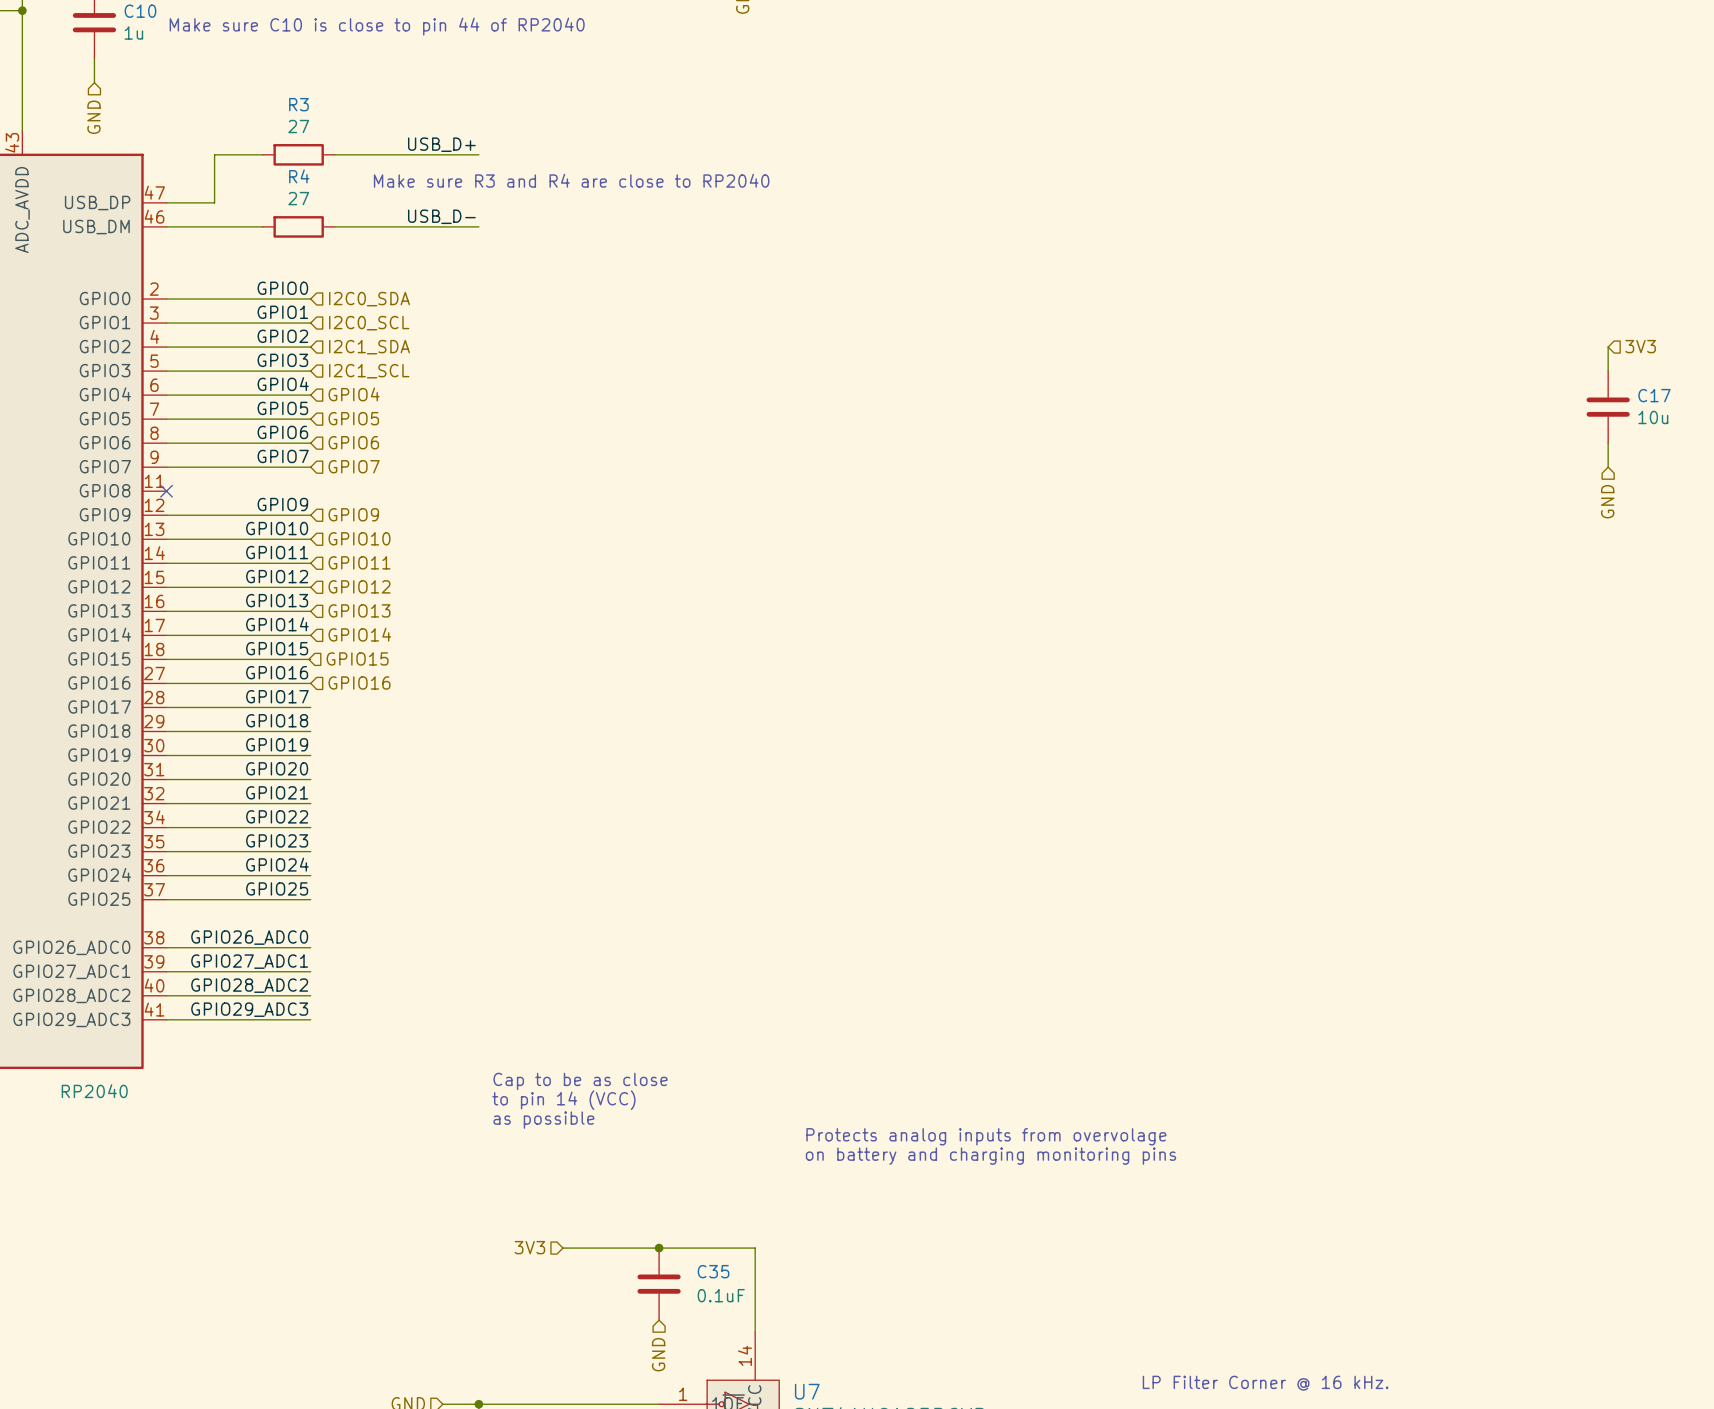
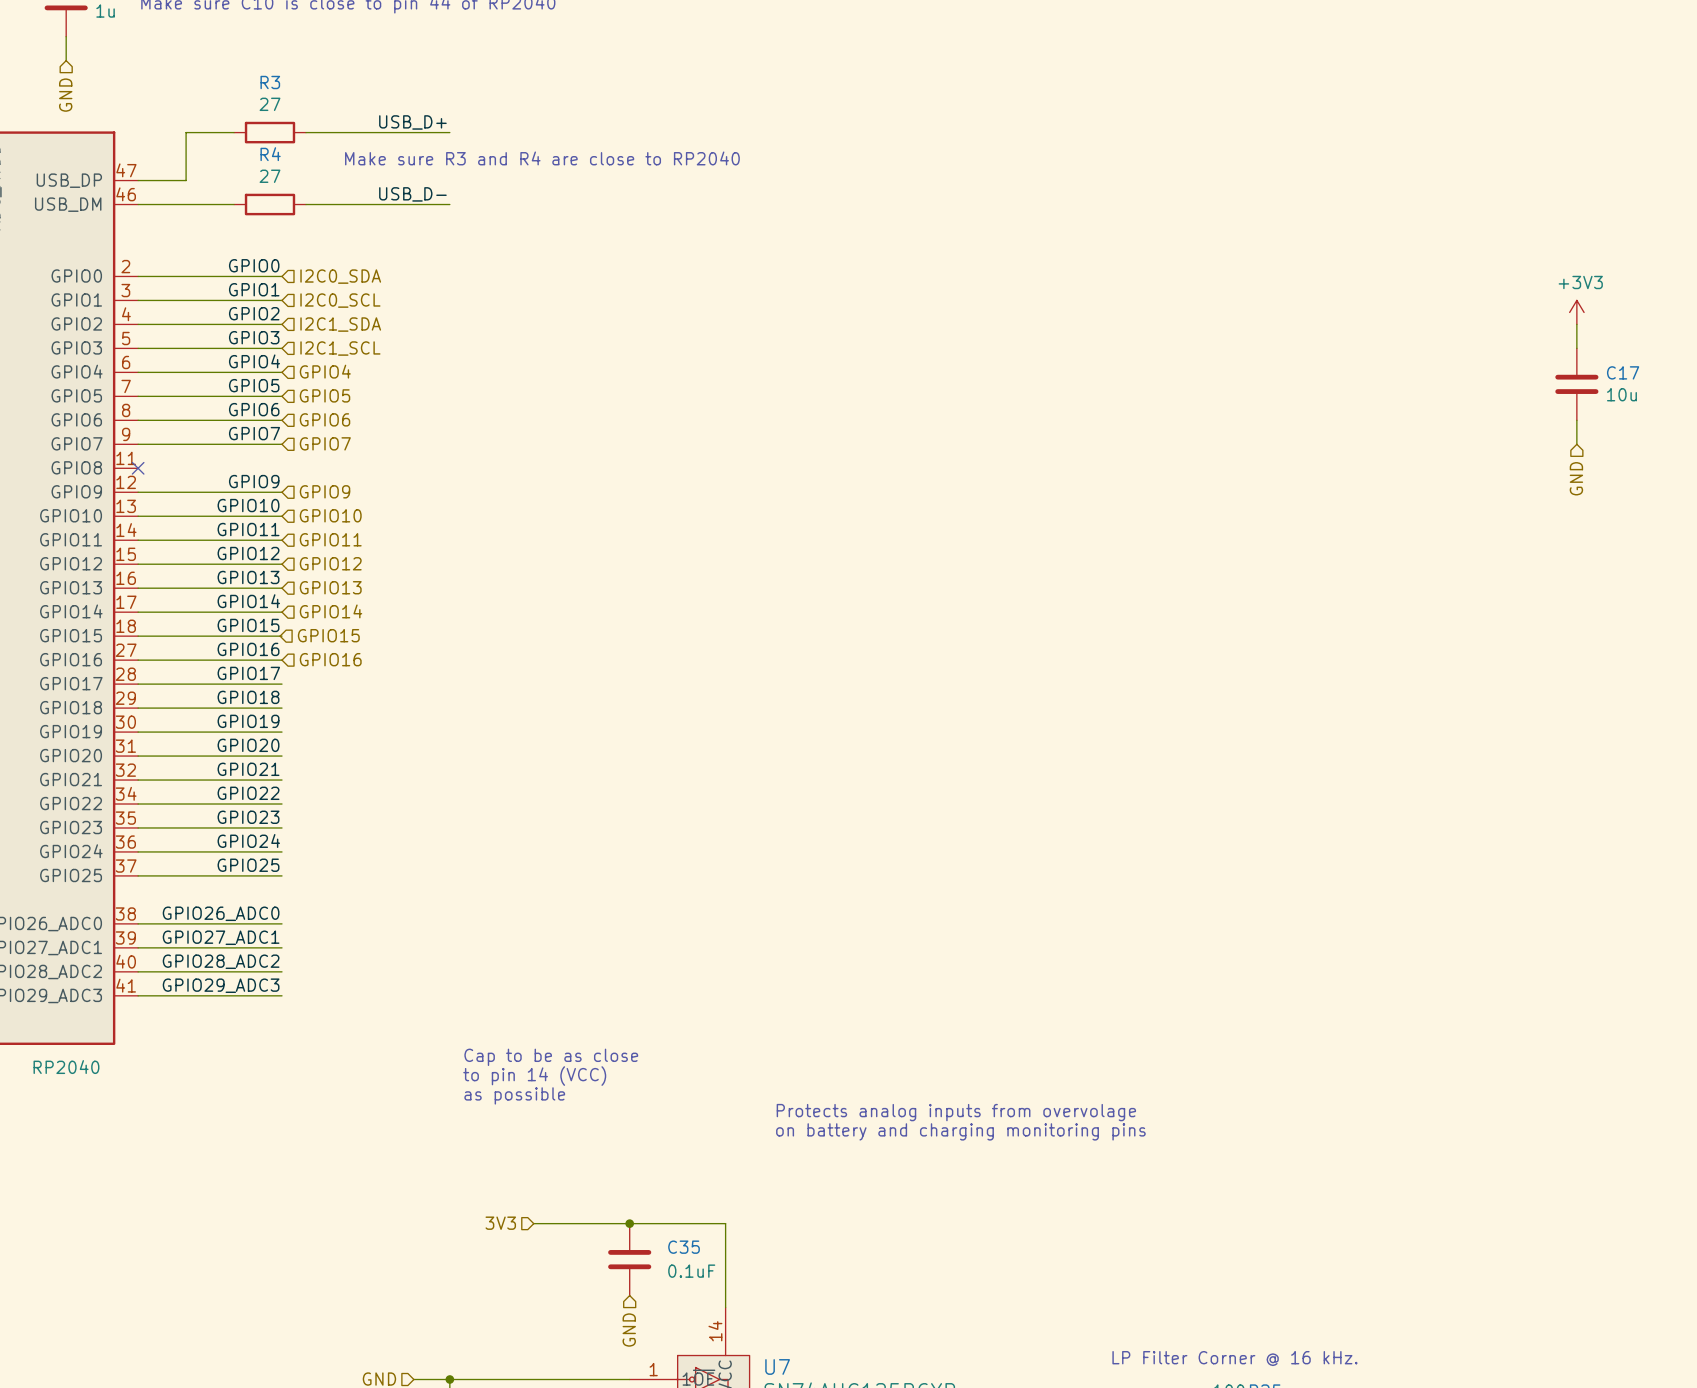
power symbol: none -> +3V3 (1576, 312)
hierarchical label: 3V3 (1640, 346) -> none

